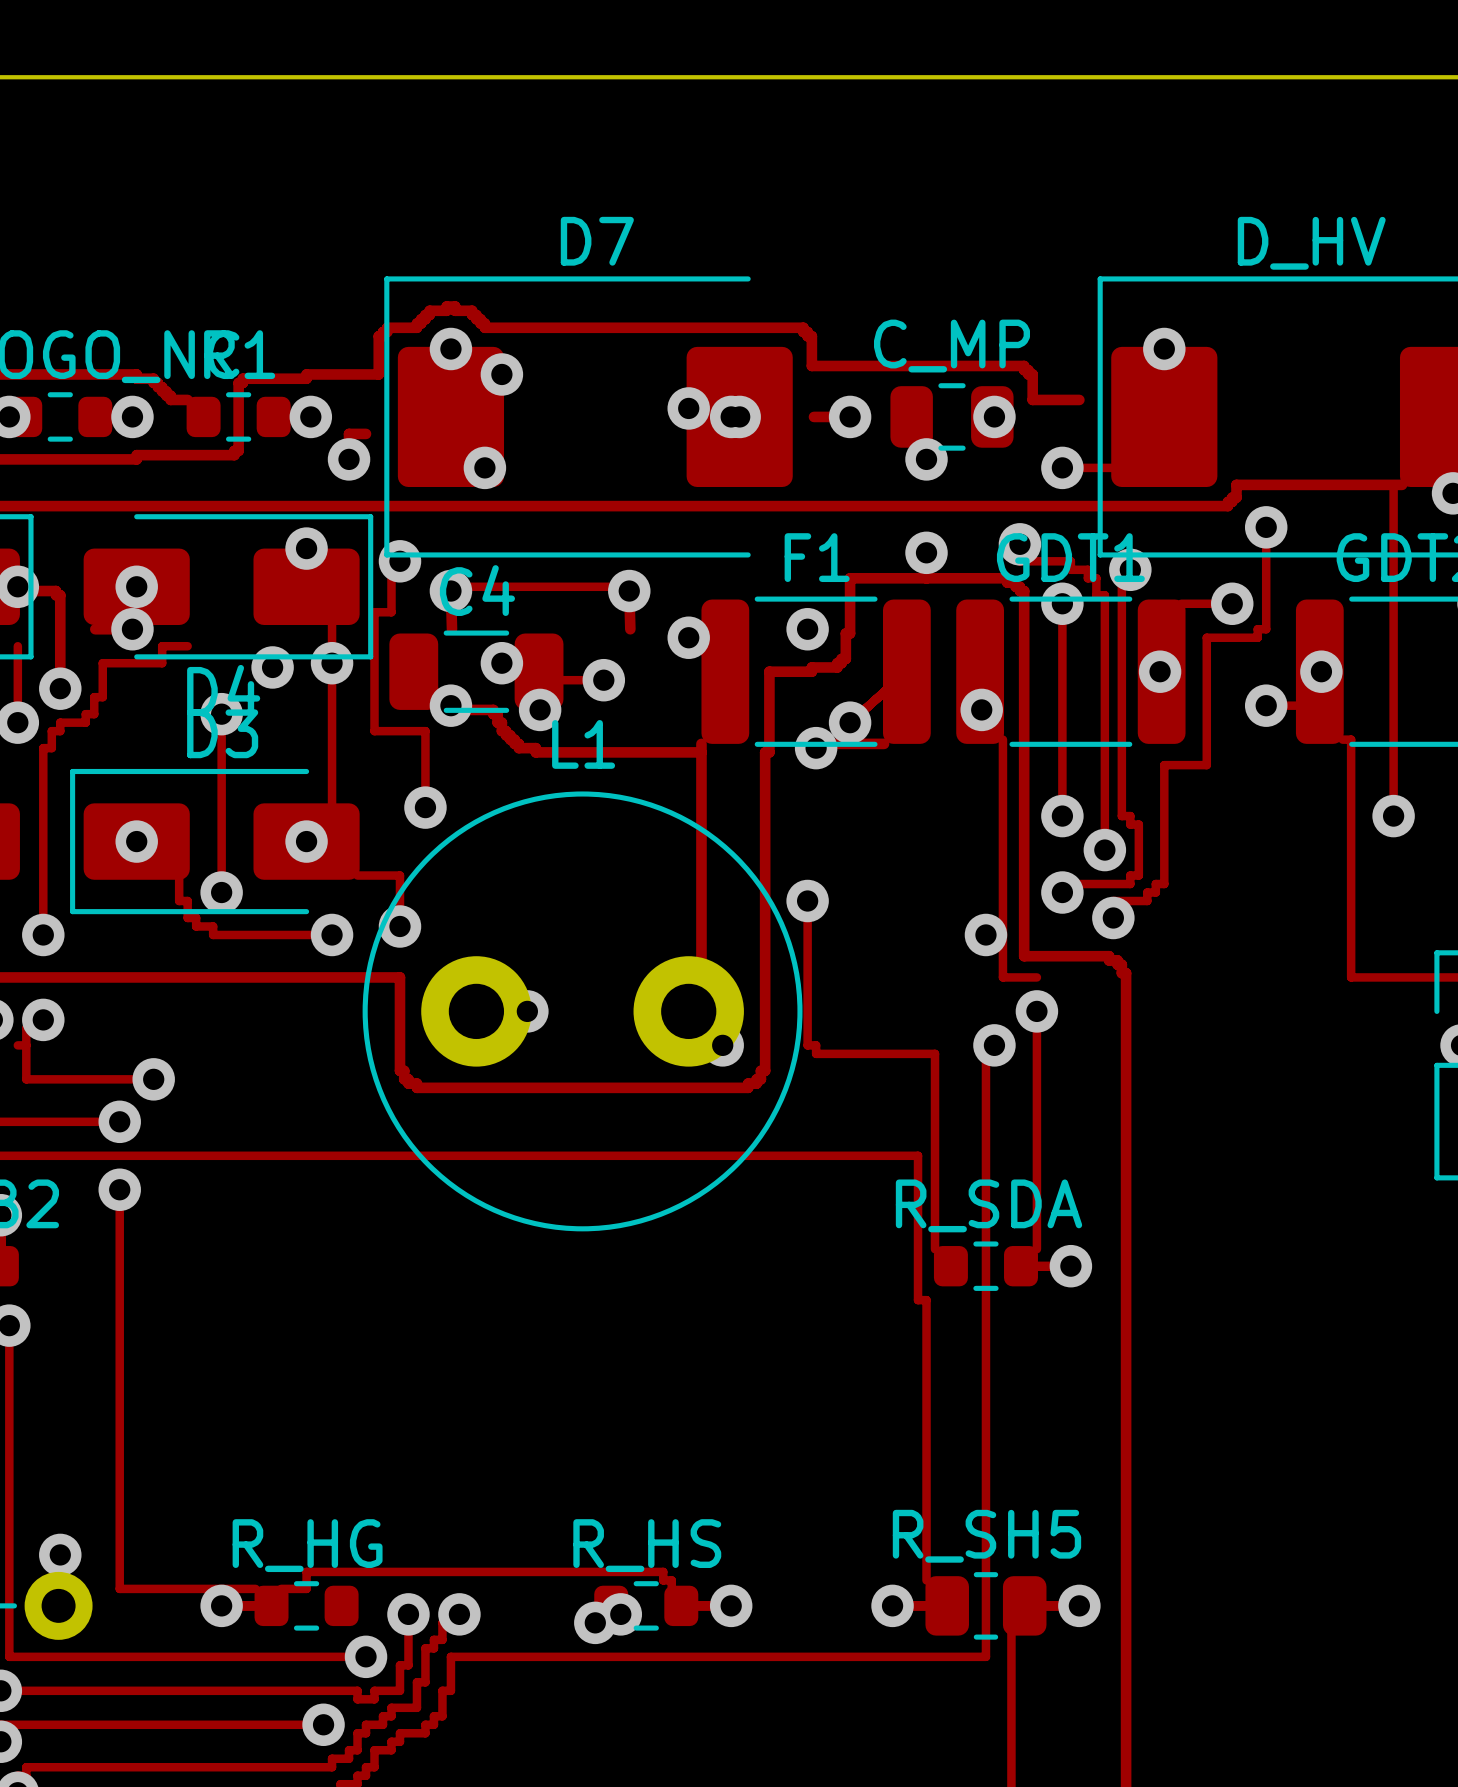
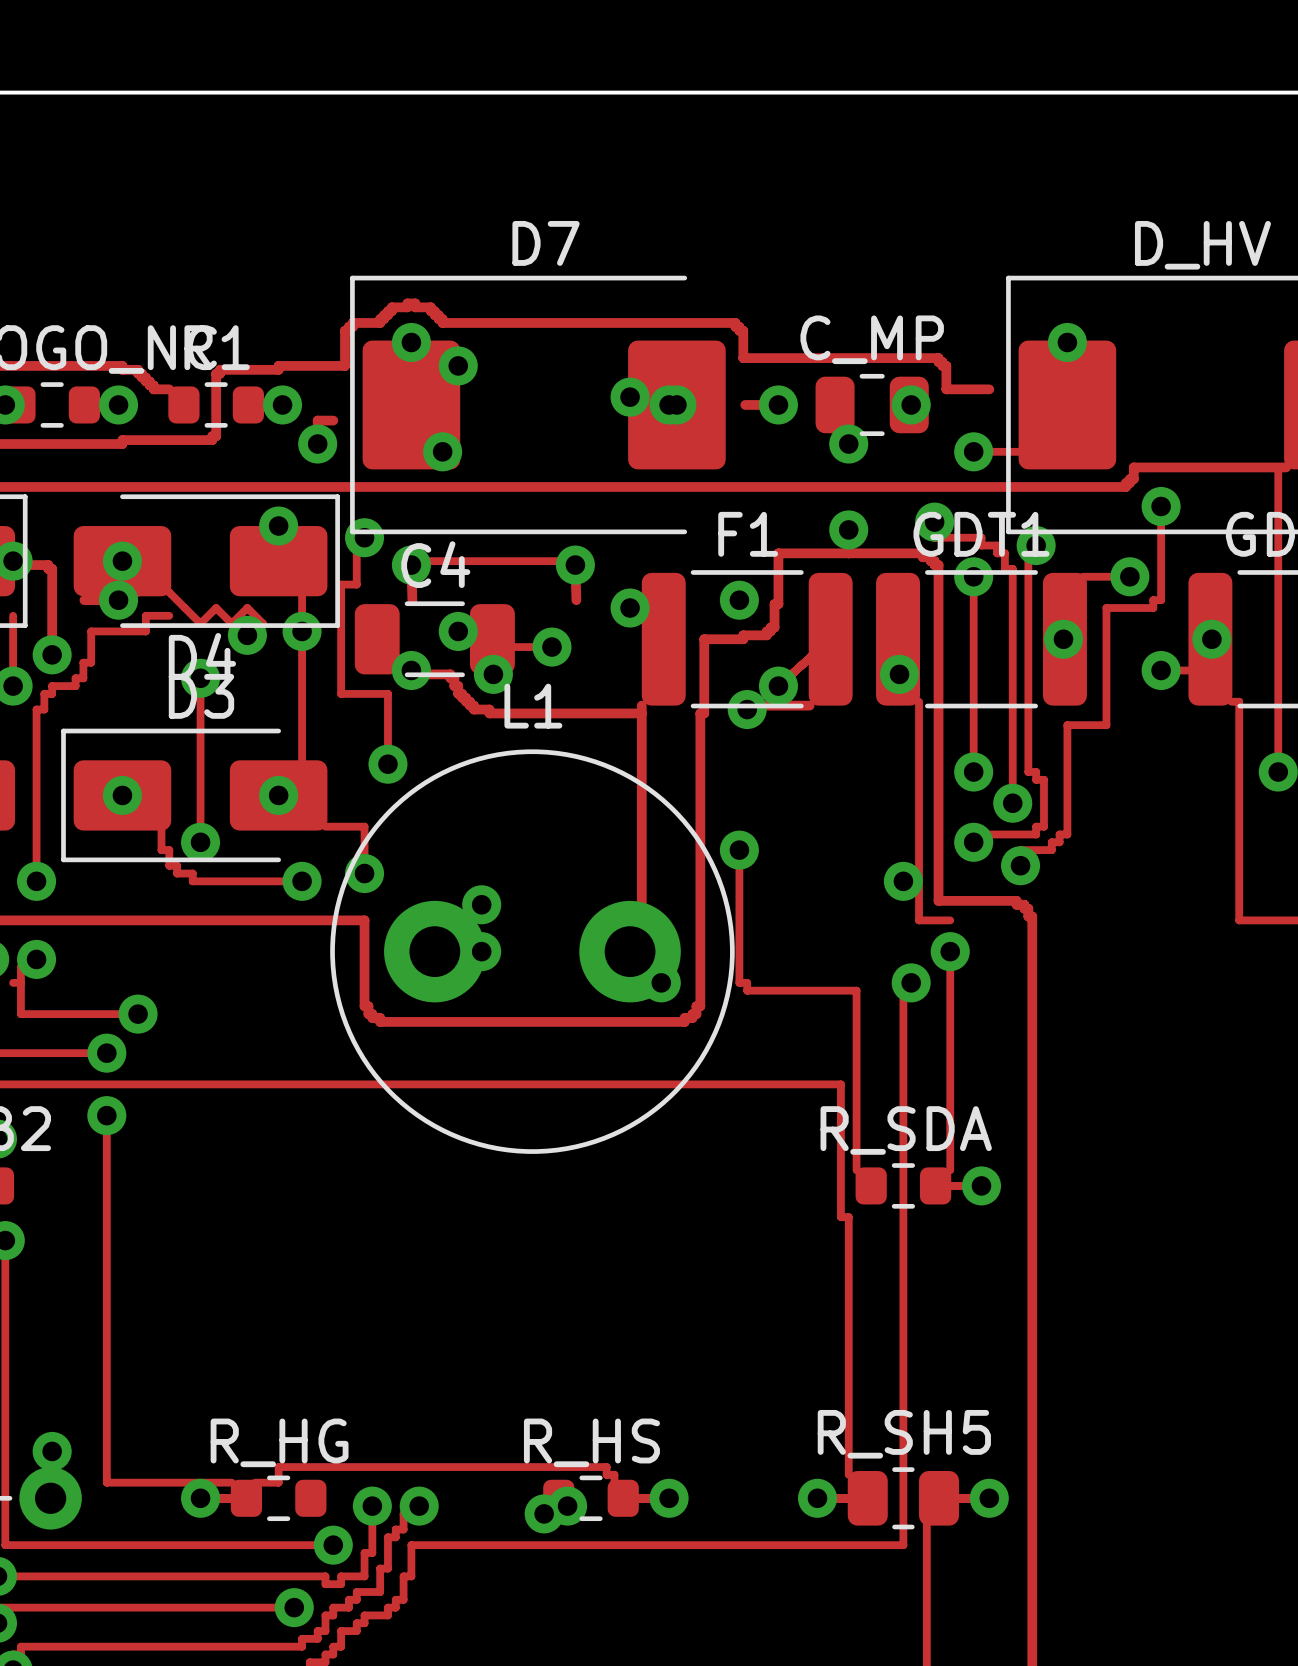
track: none -> (118, 600) (138, 592) (153, 576) (200, 623) (216, 608) (231, 623) (247, 608) (263, 623) (247, 635)
via: none -> (481, 904)

